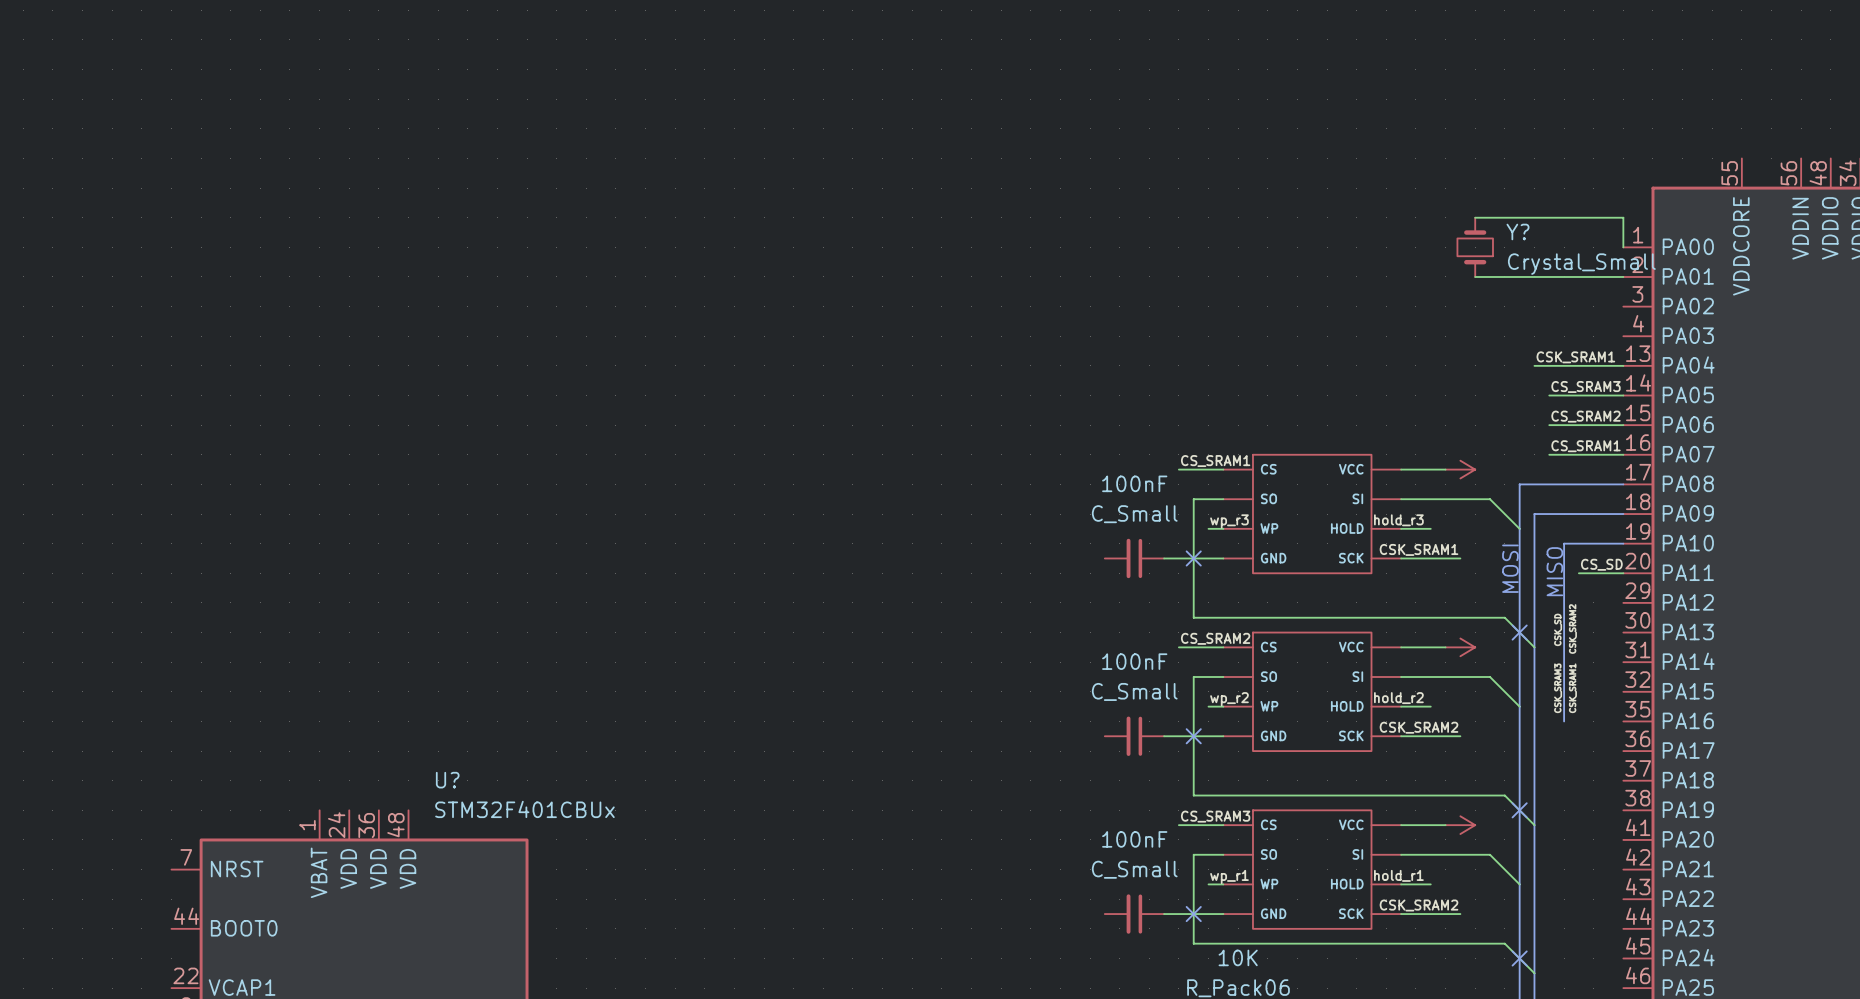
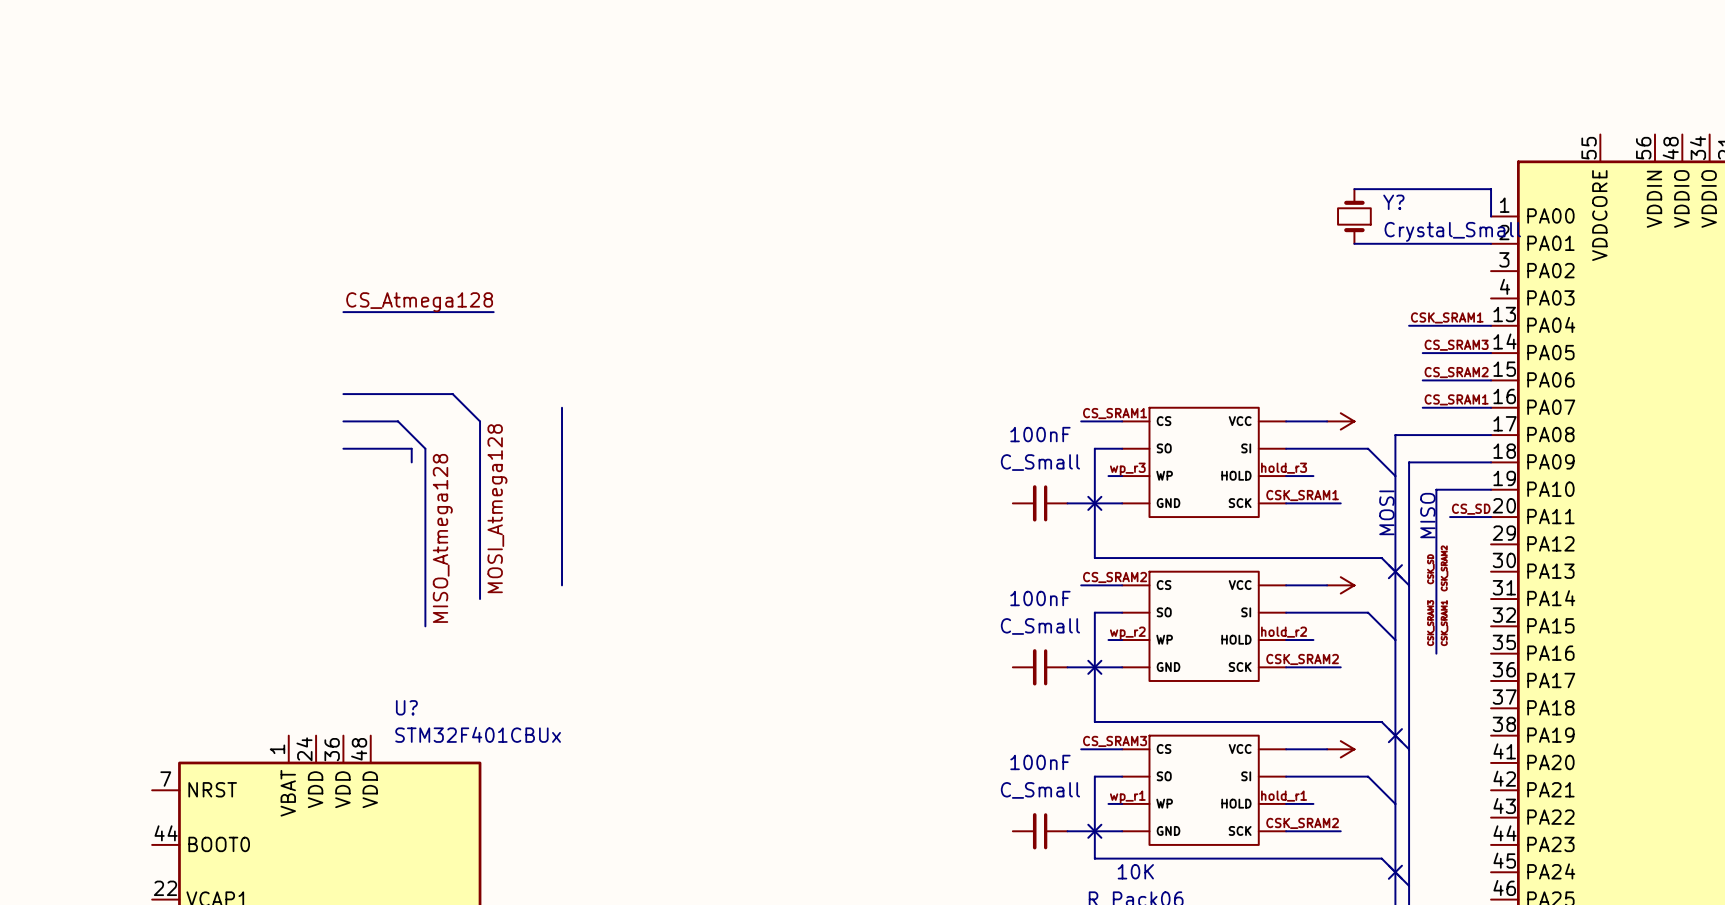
label: none -> CS_Atmega128 (419, 302)
wire: none -> (343, 312) (493, 312)
wire: none -> (343, 394) (452, 394) (480, 421)
bus: none -> (562, 407) (562, 585)
wire: none -> (343, 421) (398, 421) (425, 448)
bus: none -> (480, 421) (480, 599)
wire: none -> (343, 448) (411, 448)
bus: none -> (411, 448) (411, 462)
bus: none -> (425, 448) (425, 626)
label: none -> MOSI_Atmega128 (497, 508)
label: none -> MISO_Atmega128 (442, 538)

